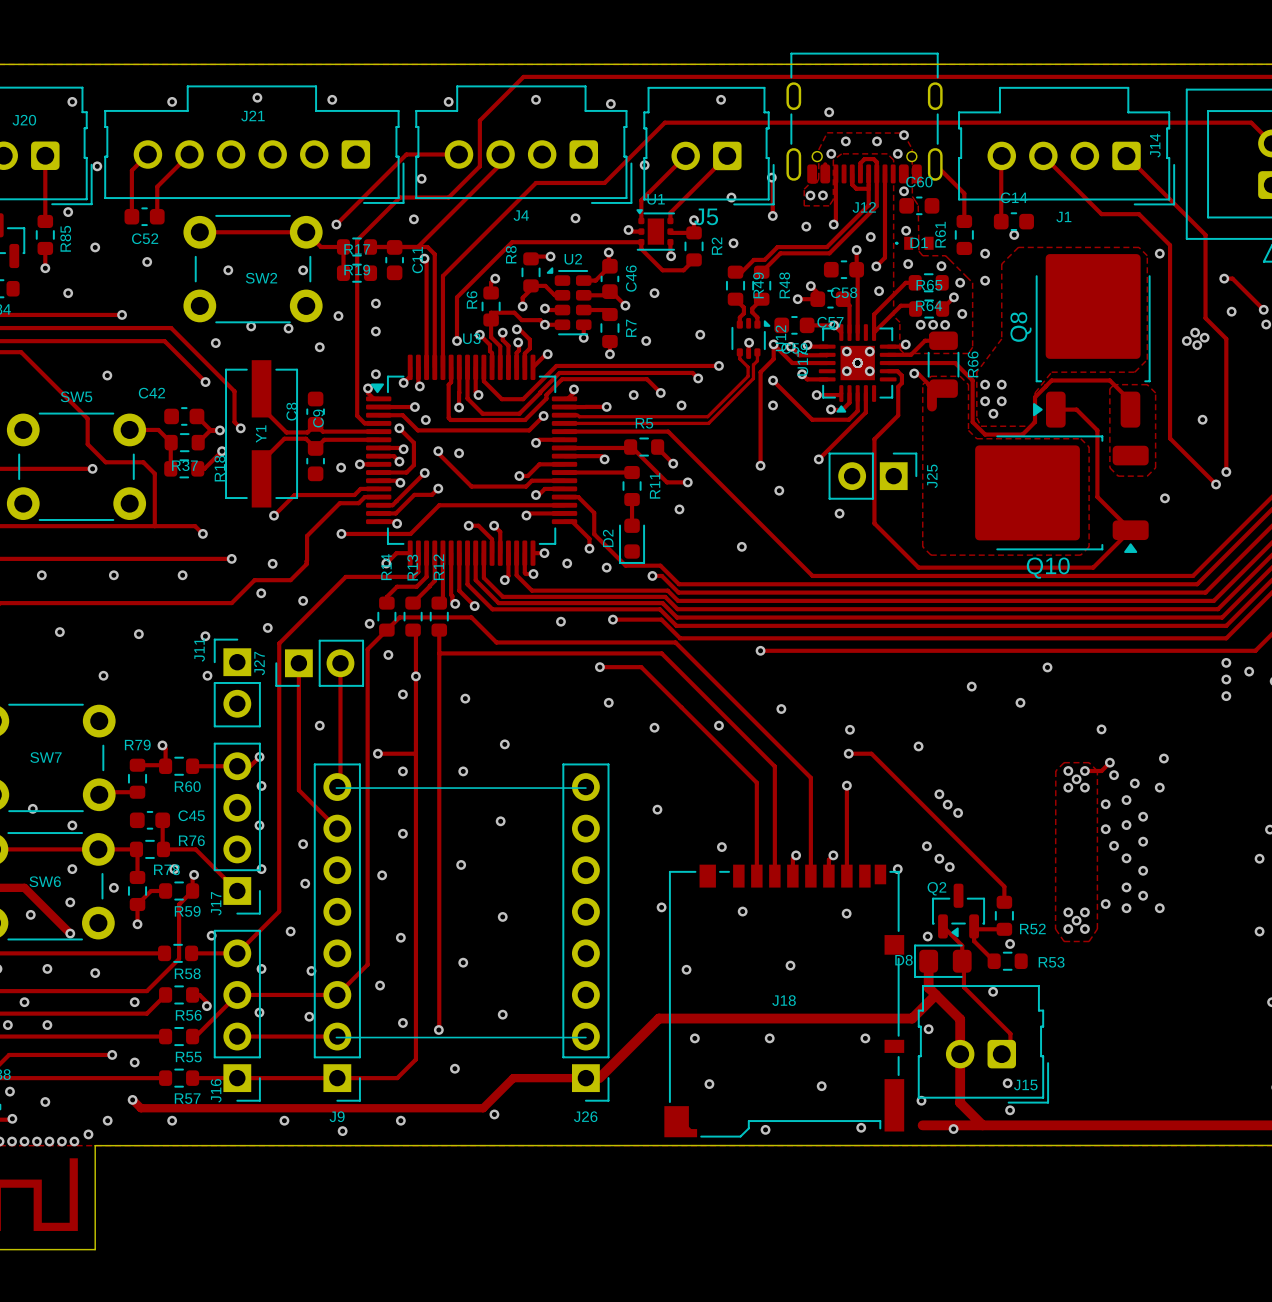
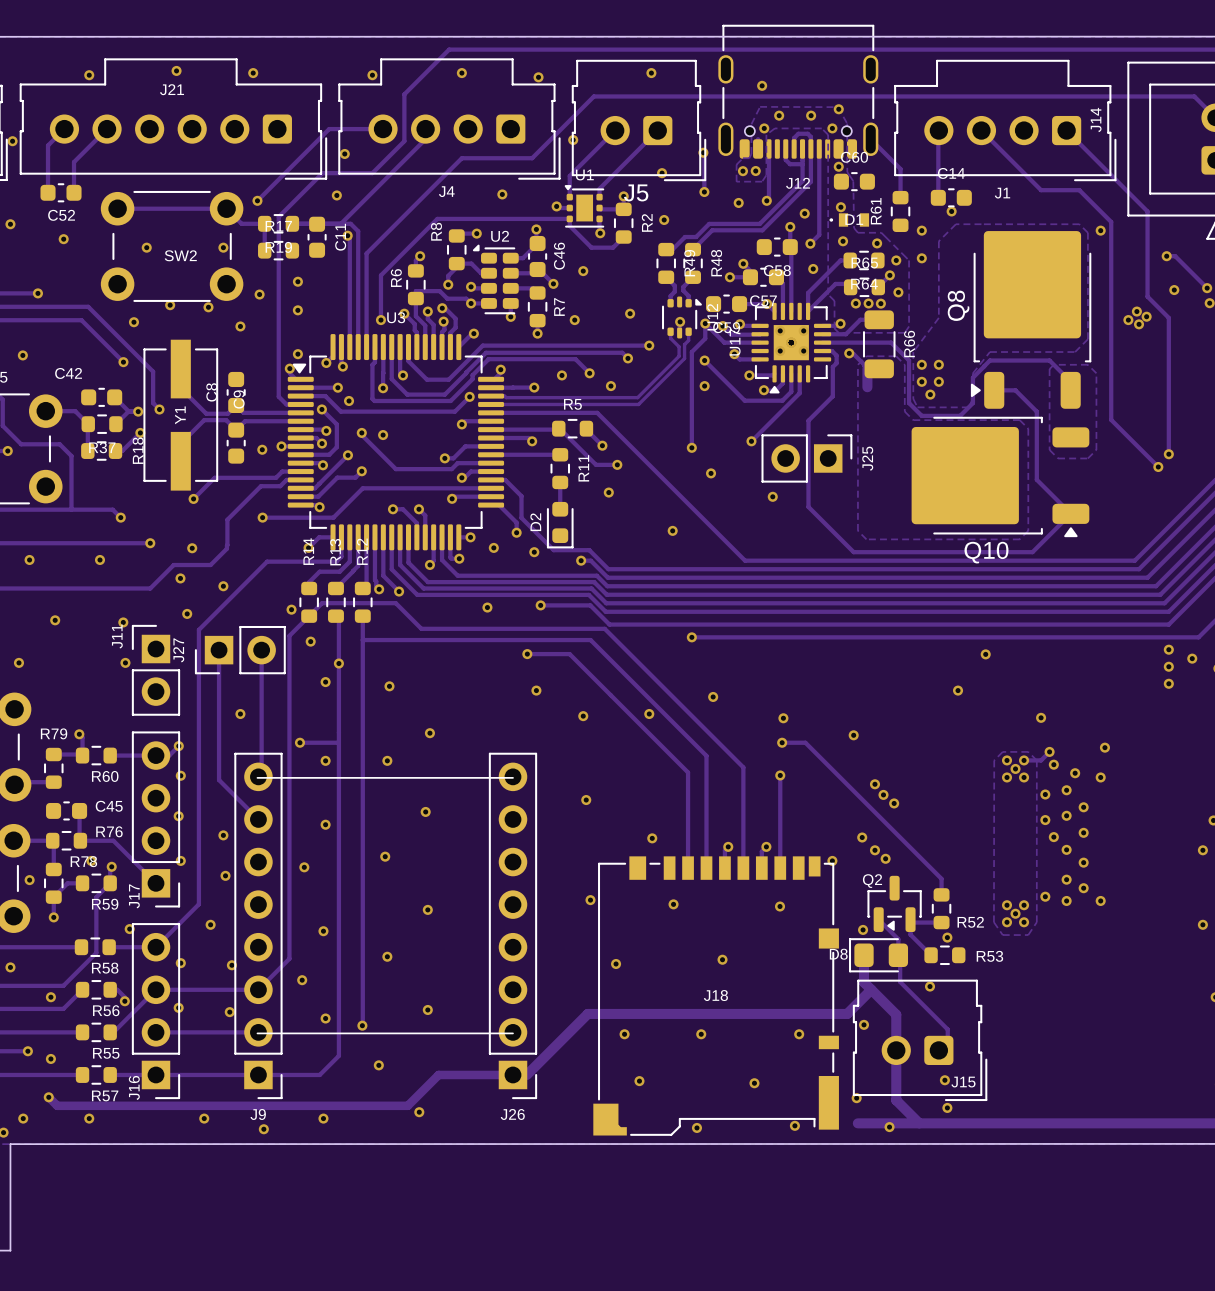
via: (1202, 419) -> none
via: (1164, 498) -> none
via: (971, 686) -> none

